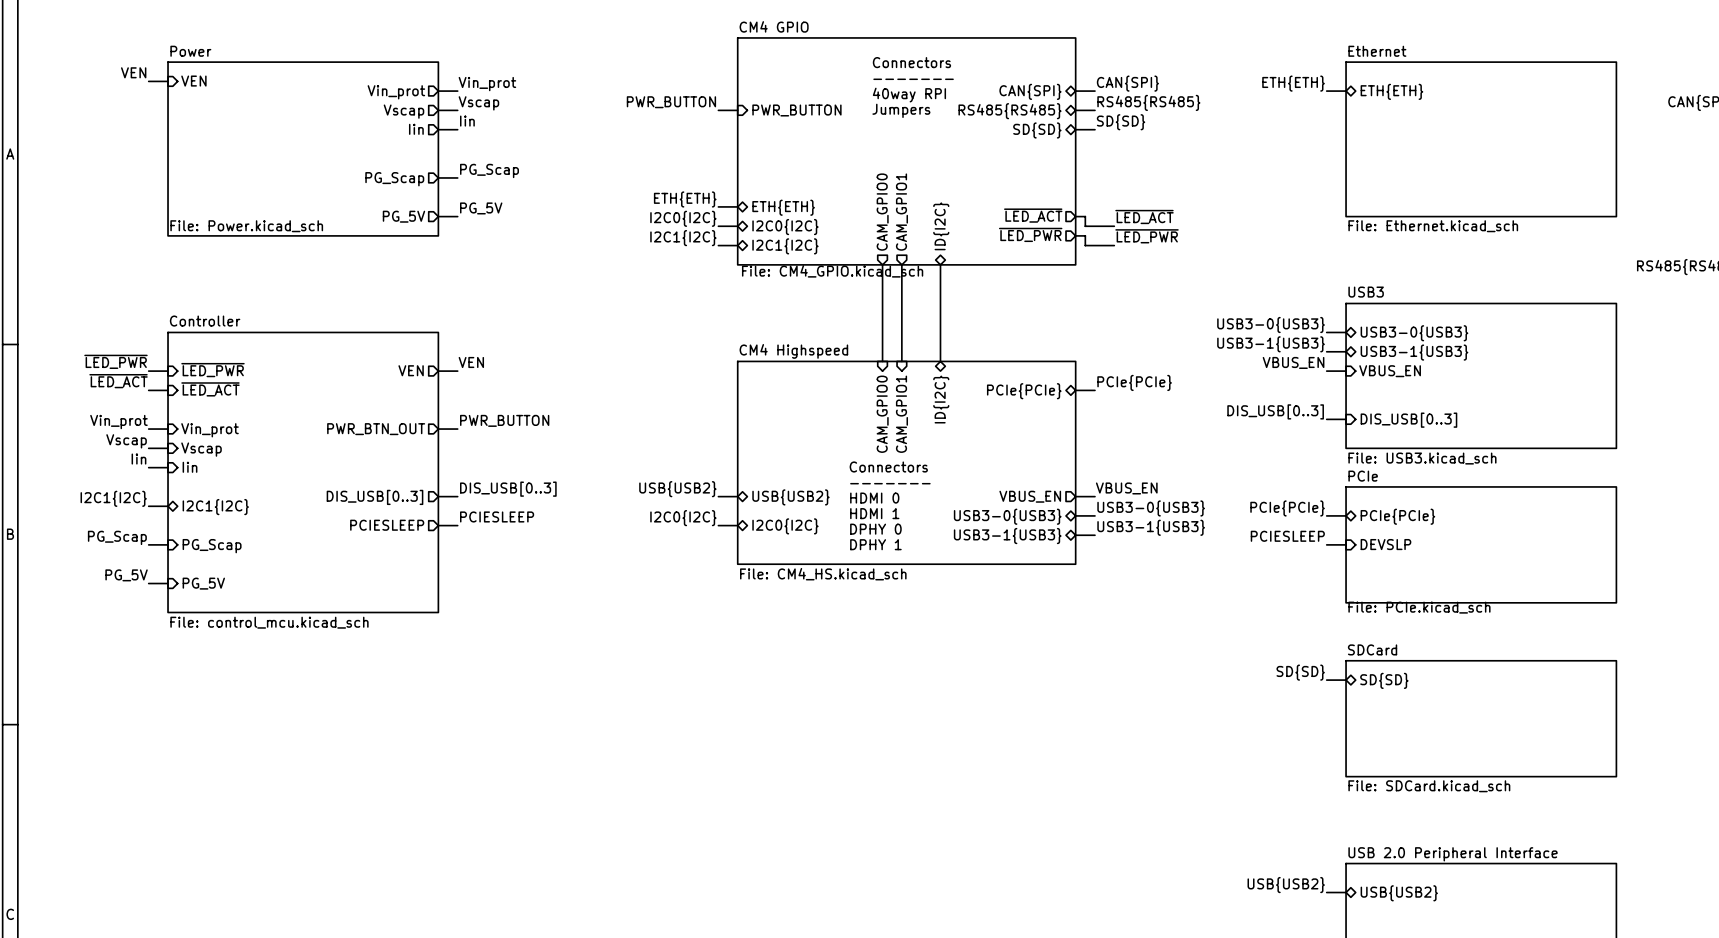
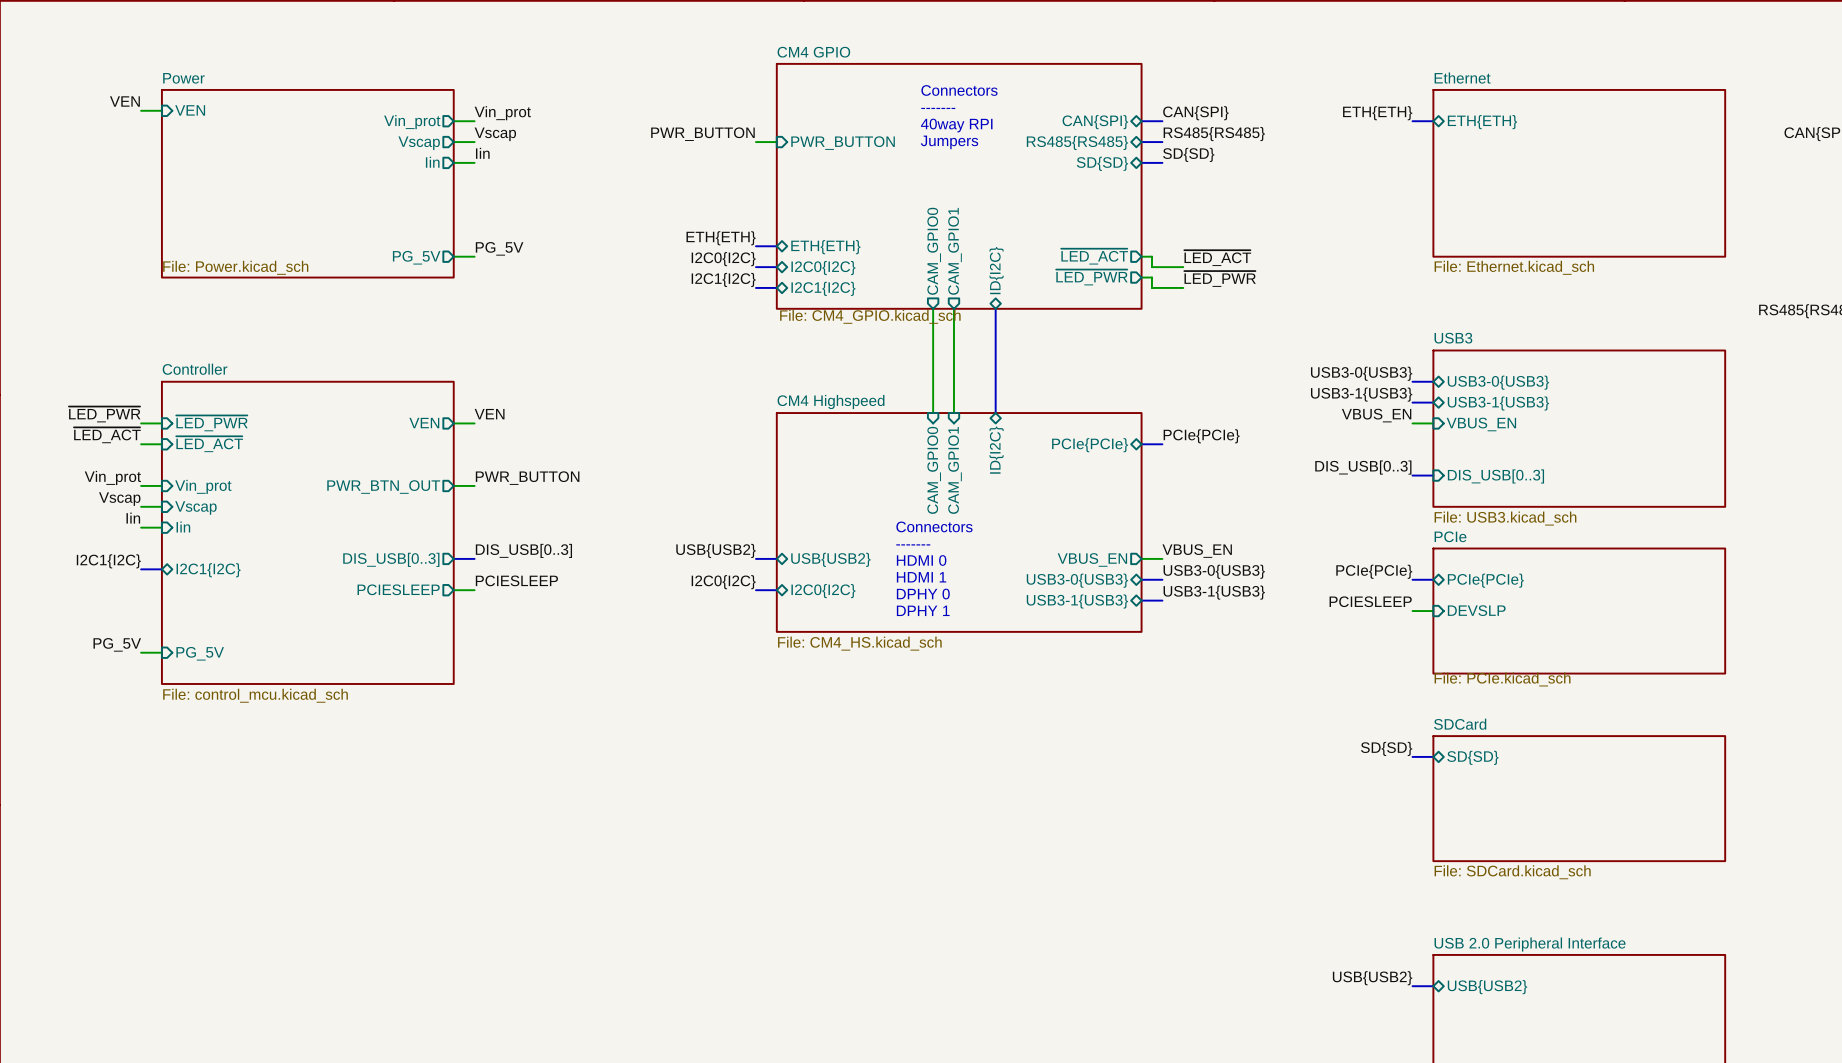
label: PG_Scap (489, 170) -> none
wire: (438, 177) (457, 177) -> none
sheet pin: PG_Scap (394, 179) -> none
label: PG_Scap (117, 537) -> none
wire: (148, 544) (168, 544) -> none
sheet pin: PG_Scap (212, 546) -> none

